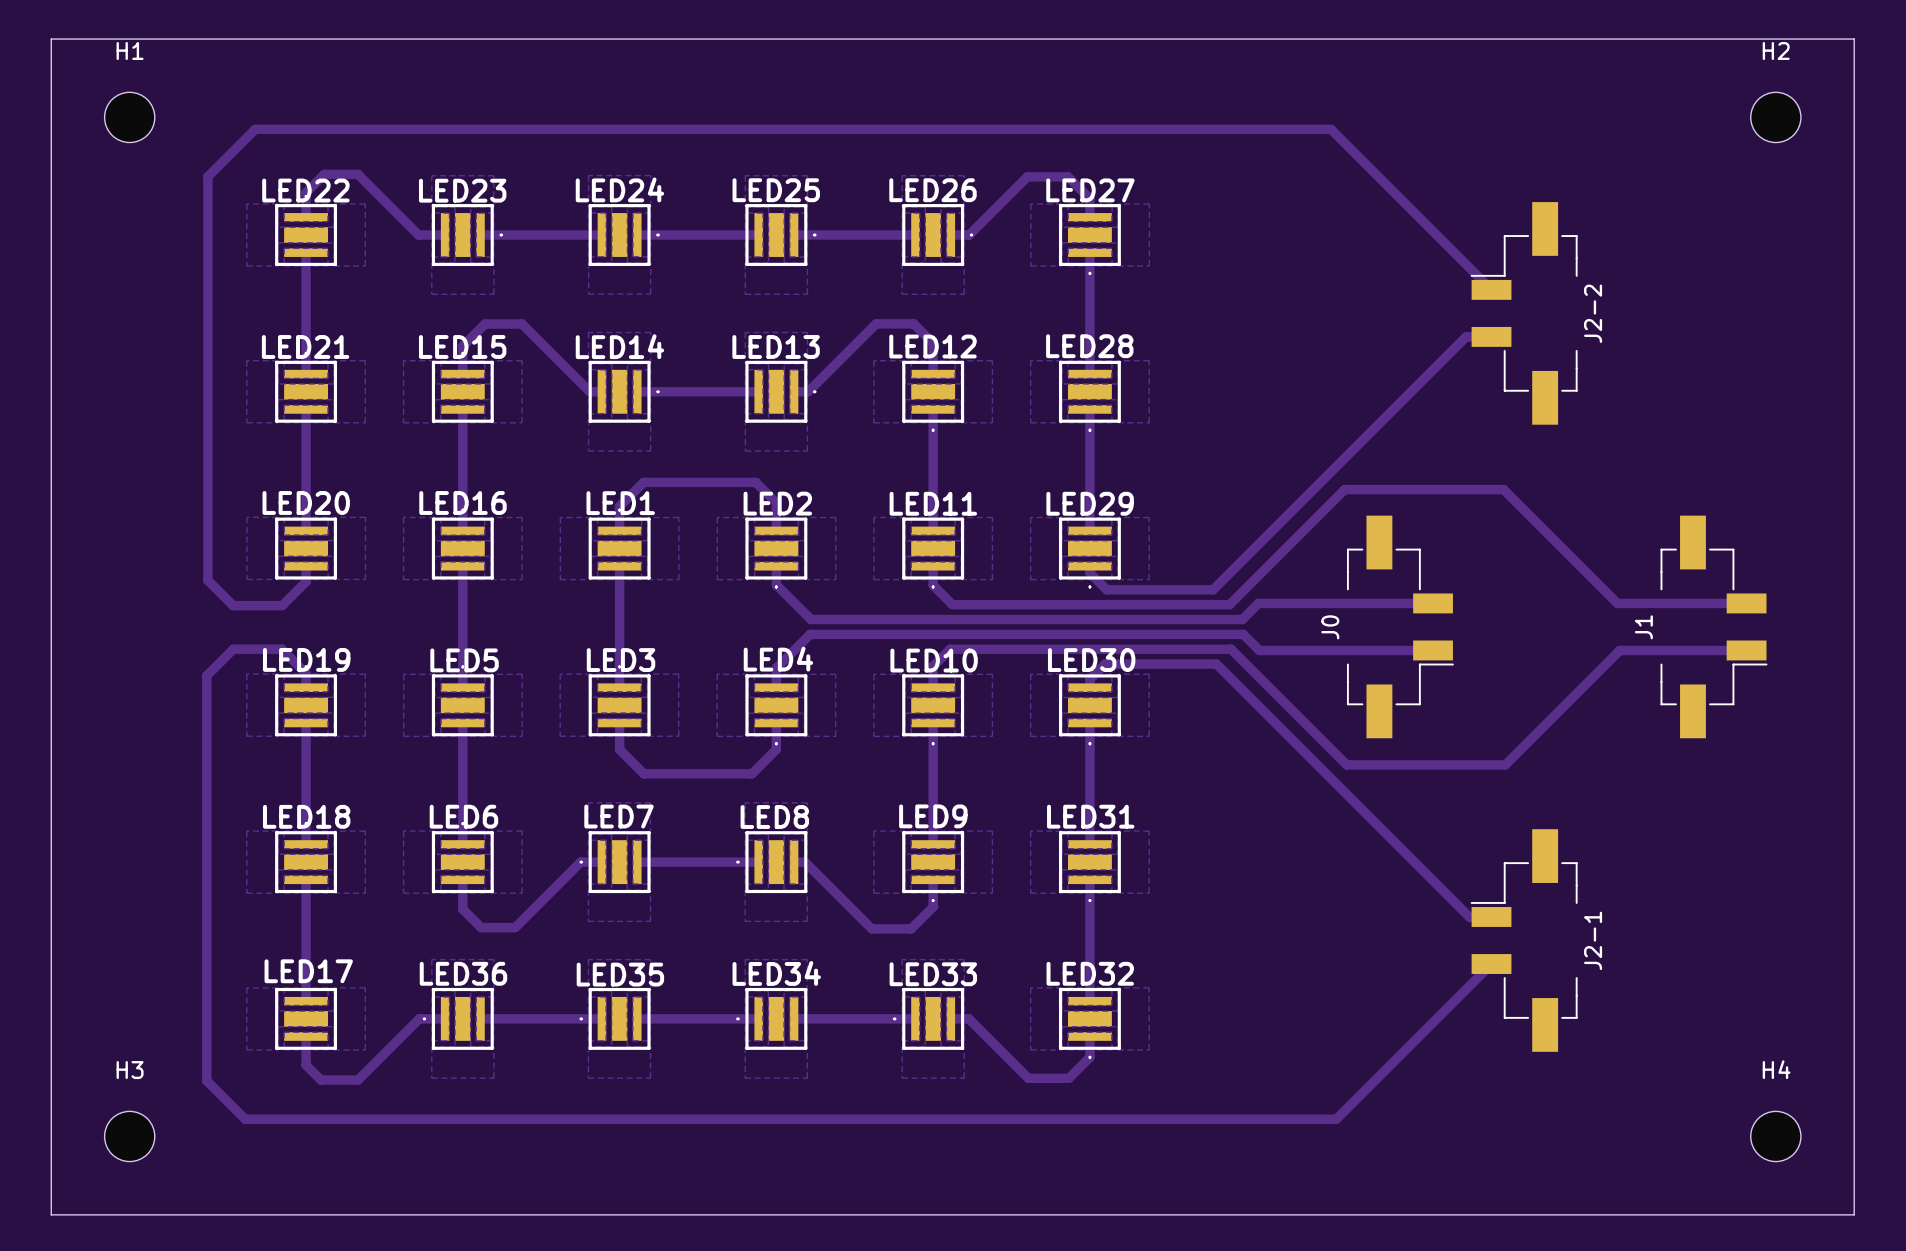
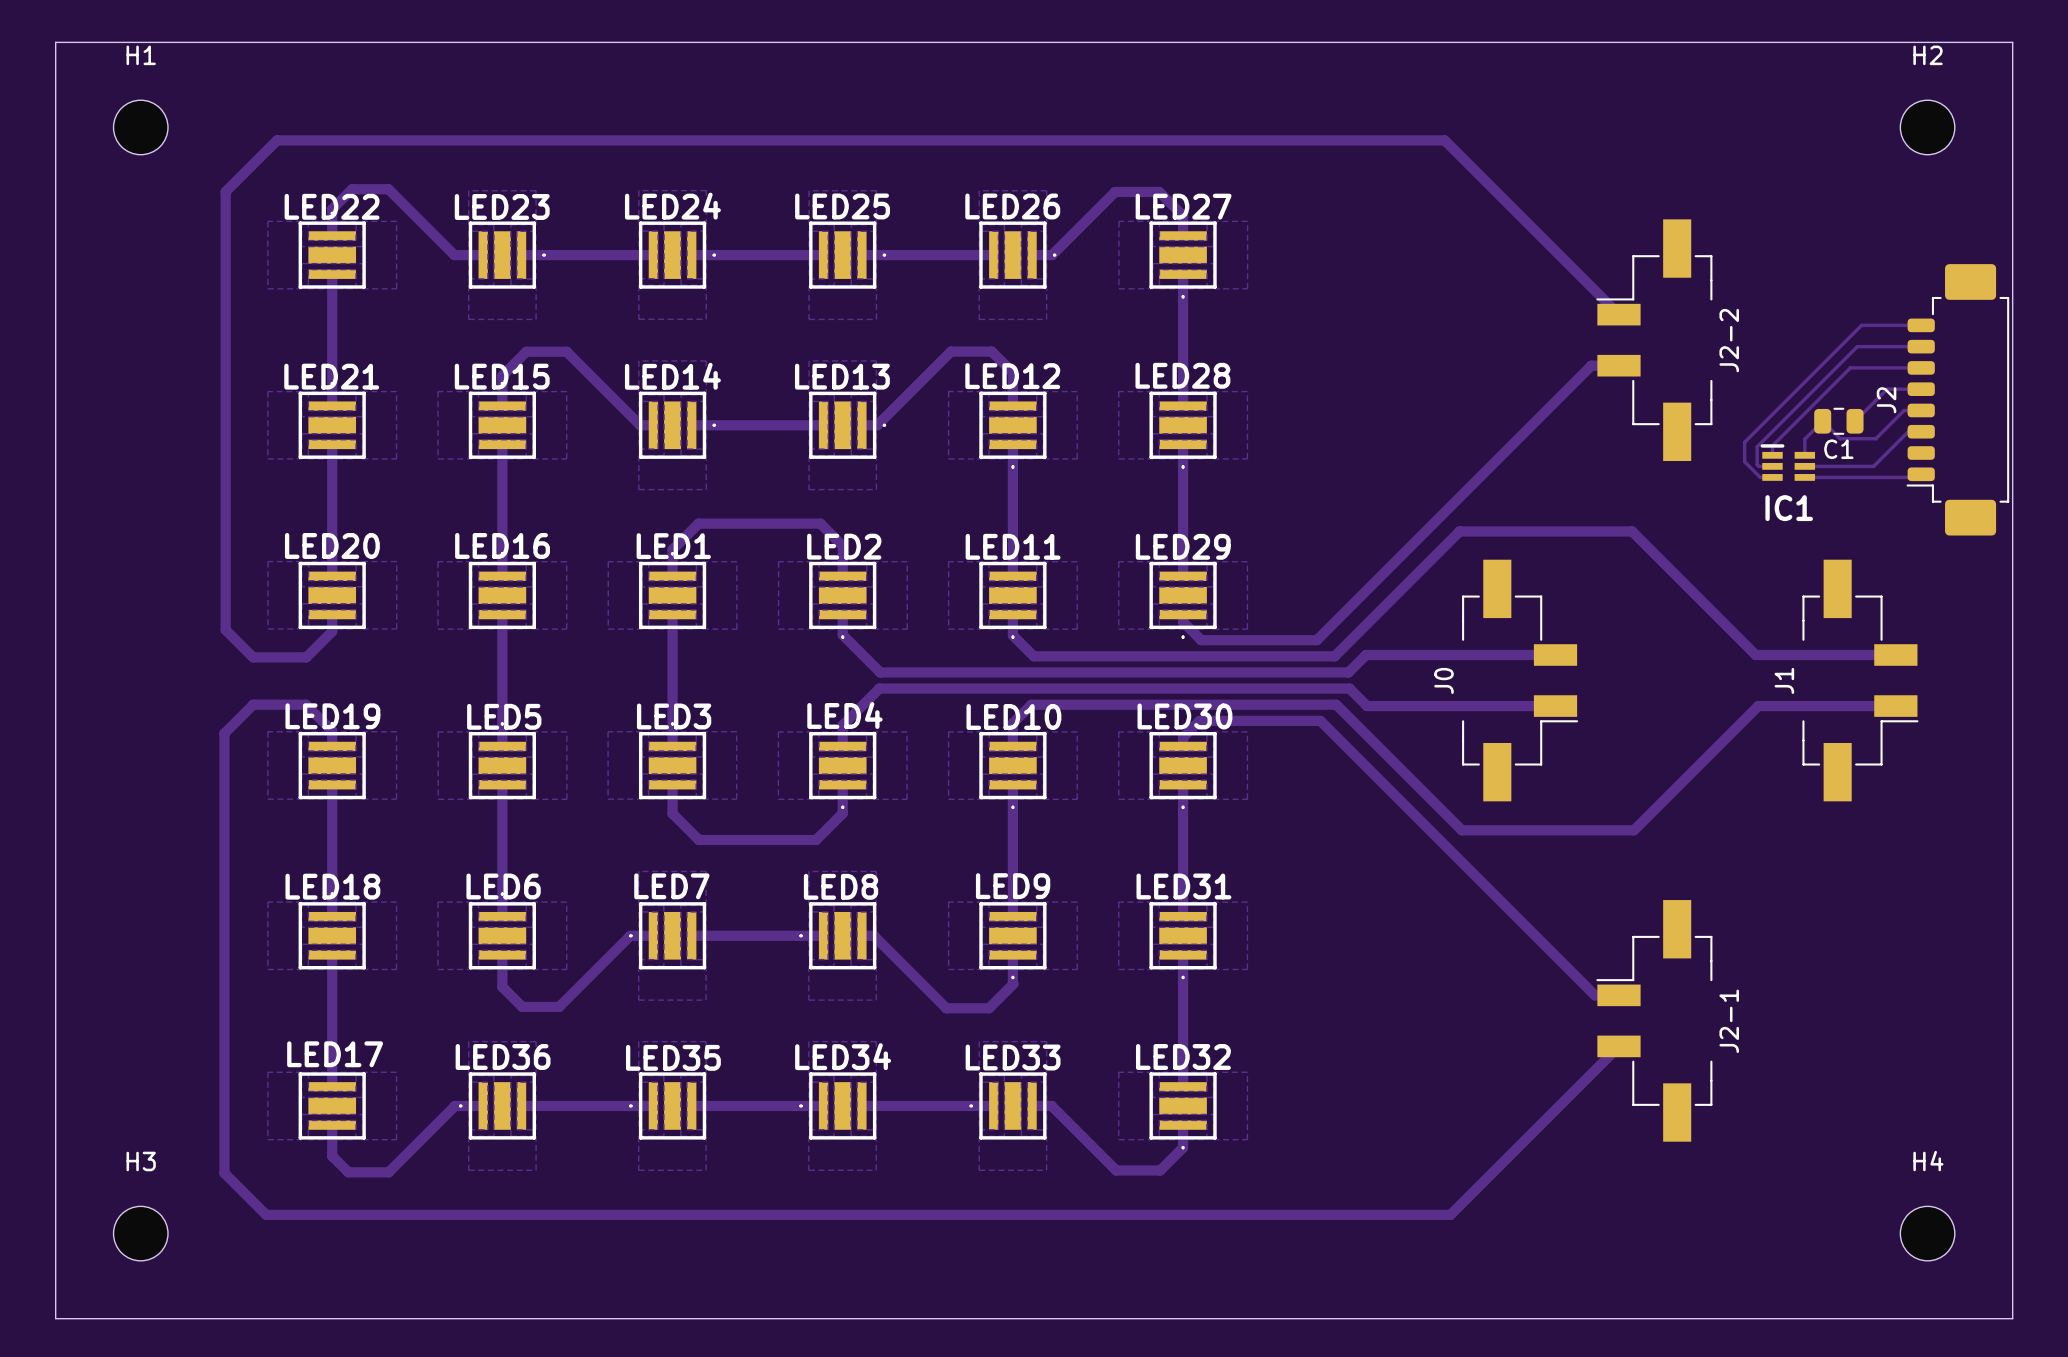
track: none -> (1921, 325) (1861, 325) (1744, 442) (1744, 461) (1760, 477) (1772, 477)
track: none -> (1921, 346) (1857, 346) (1757, 446) (1757, 464) (1758, 466) (1772, 466)
track: none -> (1921, 367) (1850, 367) (1772, 445) (1772, 455)
track: none -> (1921, 389) (1887, 389) (1855, 421)
J2: none -> (1957, 399)
track: none -> (1921, 410) (1904, 410) (1875, 438) (1840, 438) (1822, 421) (1804, 439) (1804, 455)
C1: none -> (1838, 421)
track: none -> (1921, 431) (1908, 431) (1873, 466) (1804, 466)
IC1: none -> (1787, 462)
track: none -> (1915, 468) (1921, 474) (1918, 477) (1804, 477)

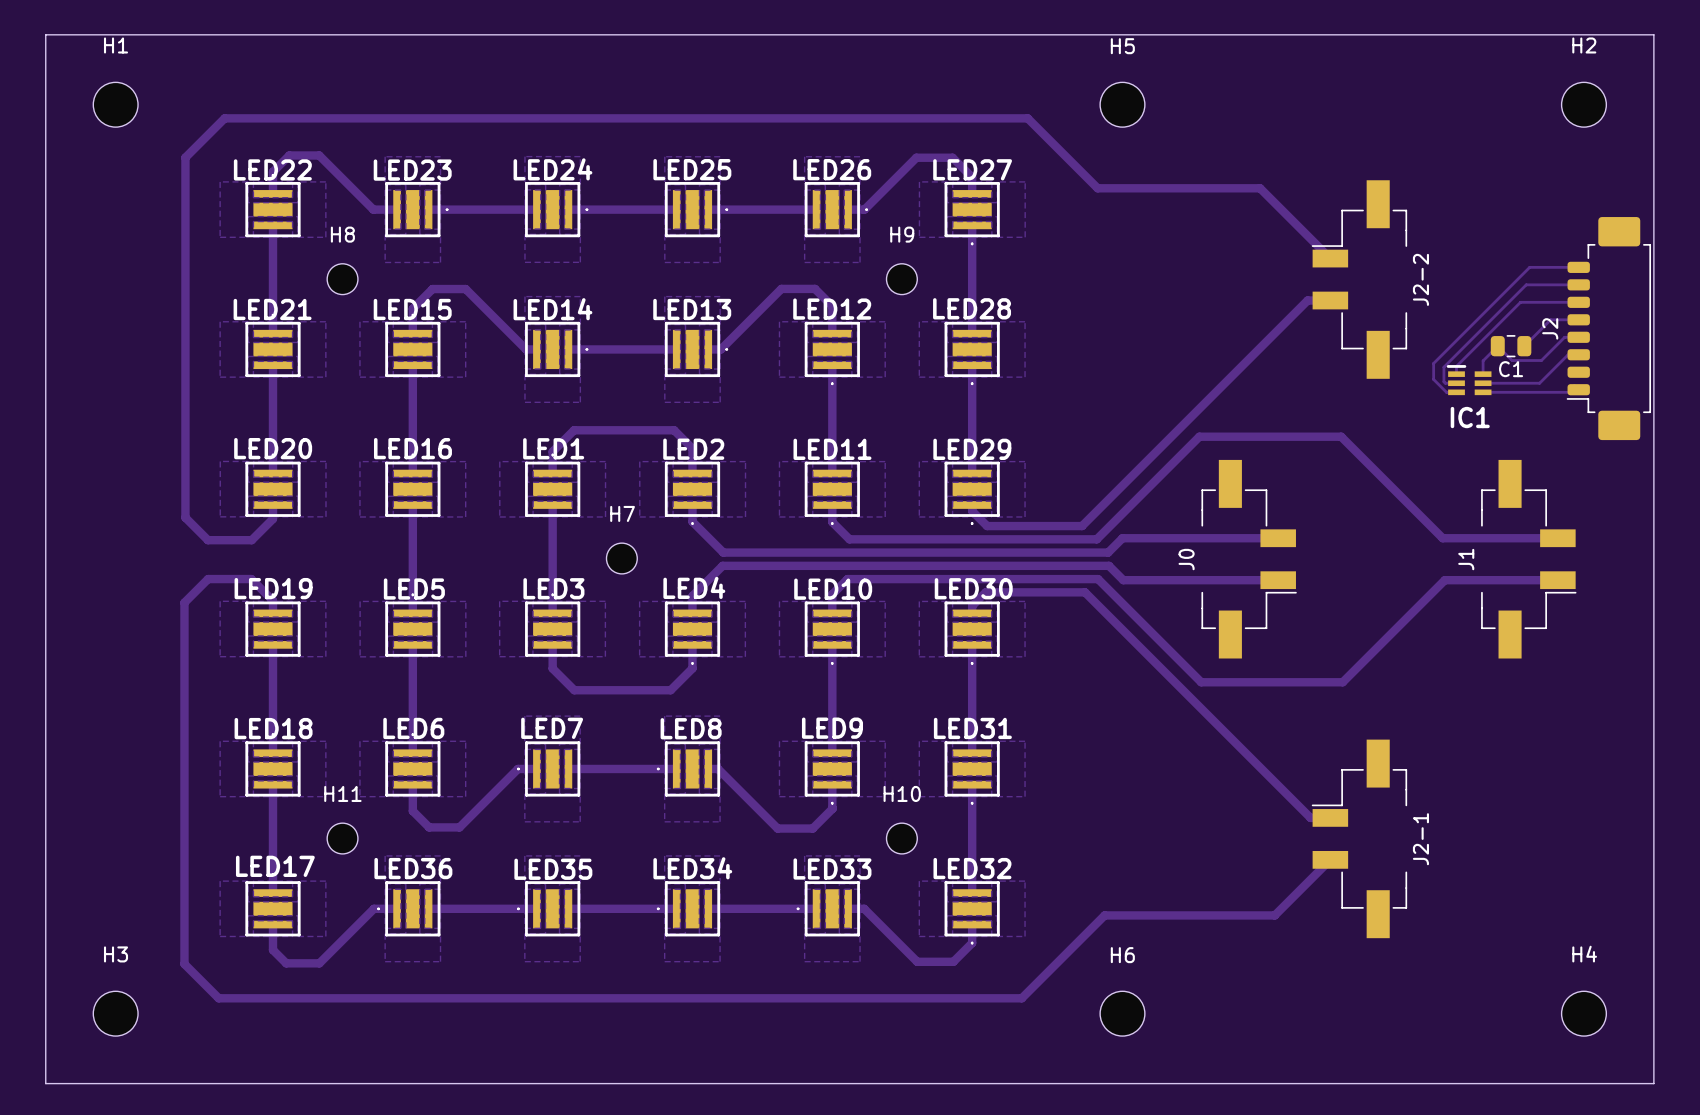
H5: none -> (1122, 104)
track: (273, 144) (277, 140) (1444, 140) (1533, 229) -> (224, 118) (1027, 118) (1097, 188) (1260, 188)
H8: none -> (342, 279)
H9: none -> (901, 279)
H7: none -> (621, 558)
H11: none -> (342, 838)
H10: none -> (901, 838)
track: (1551, 1114) (1450, 1214) (1243, 1214) -> (1274, 915) (1104, 915) (1021, 998)
H6: none -> (1122, 1013)

